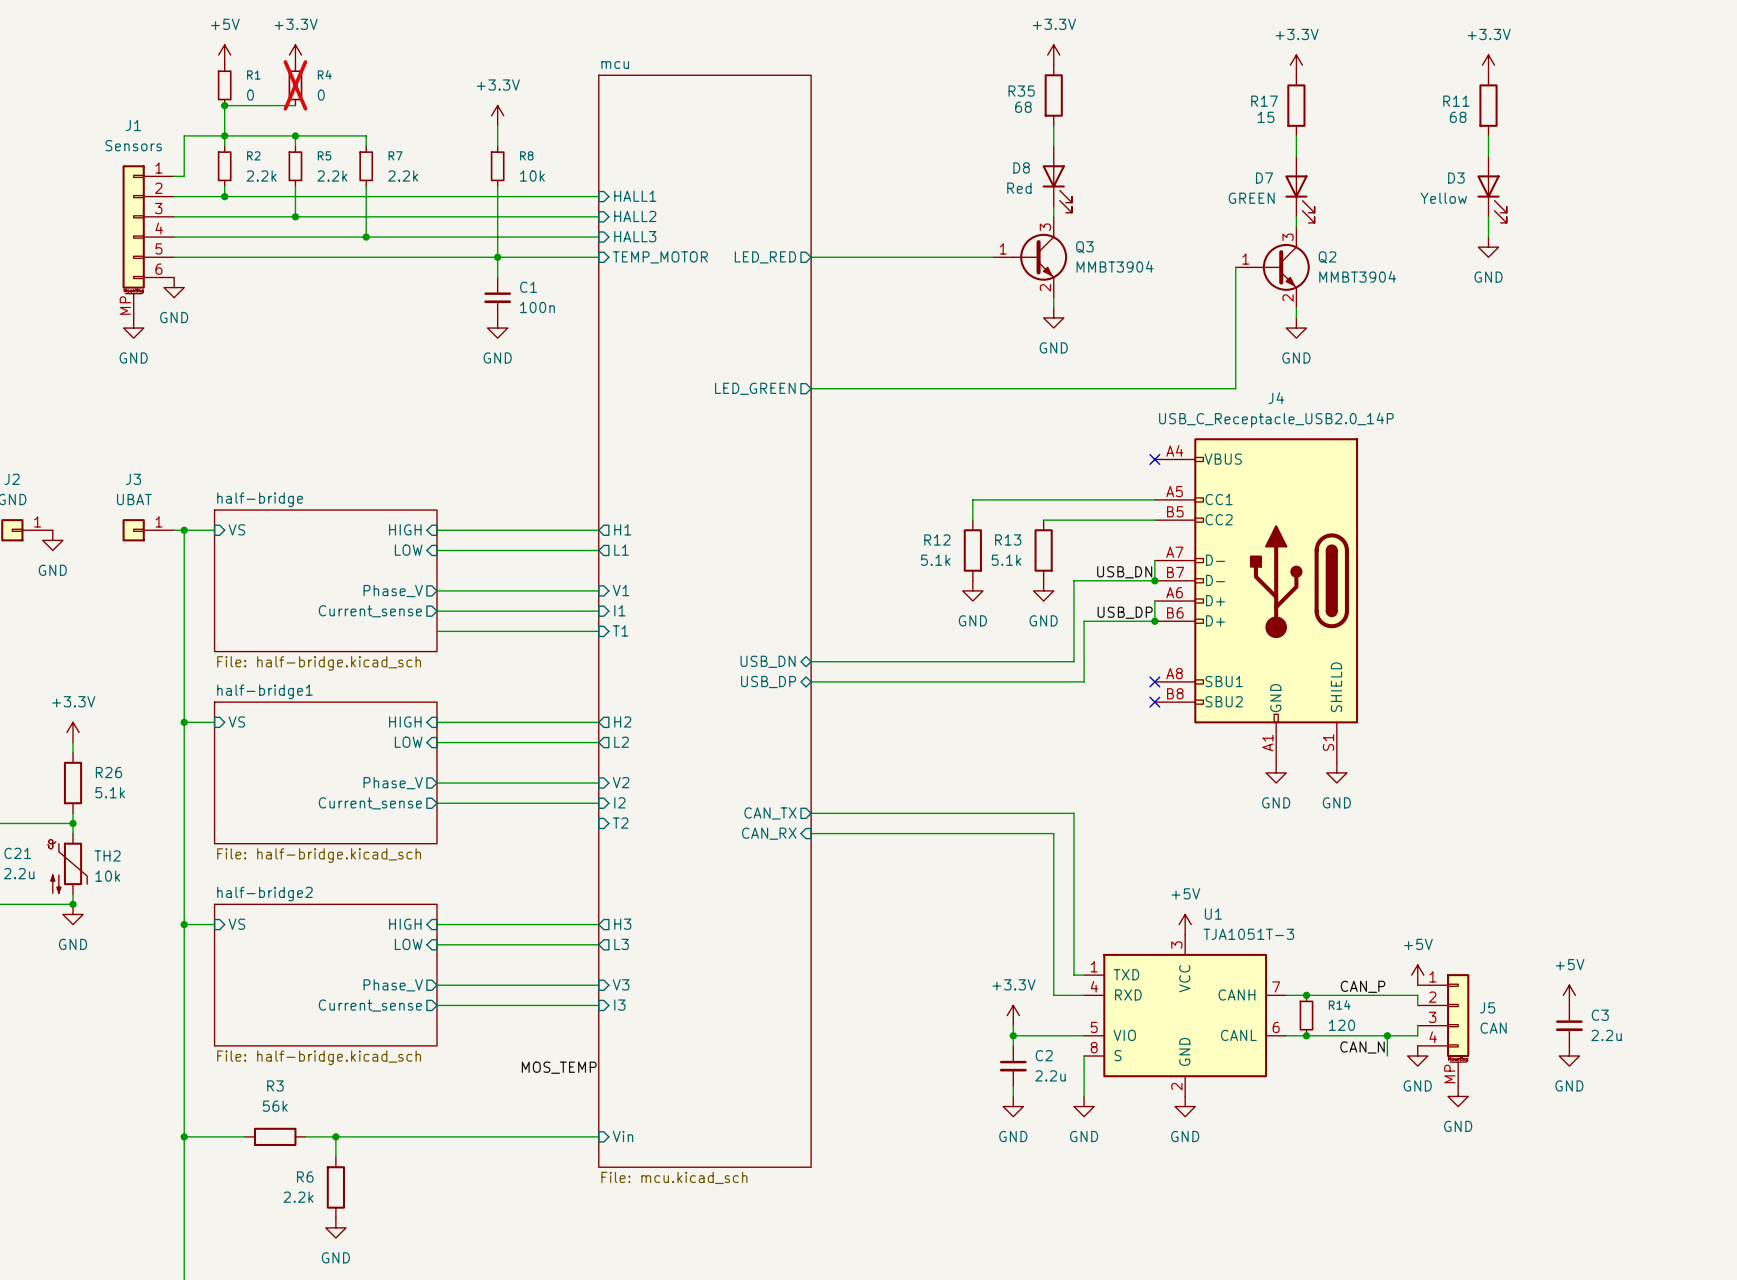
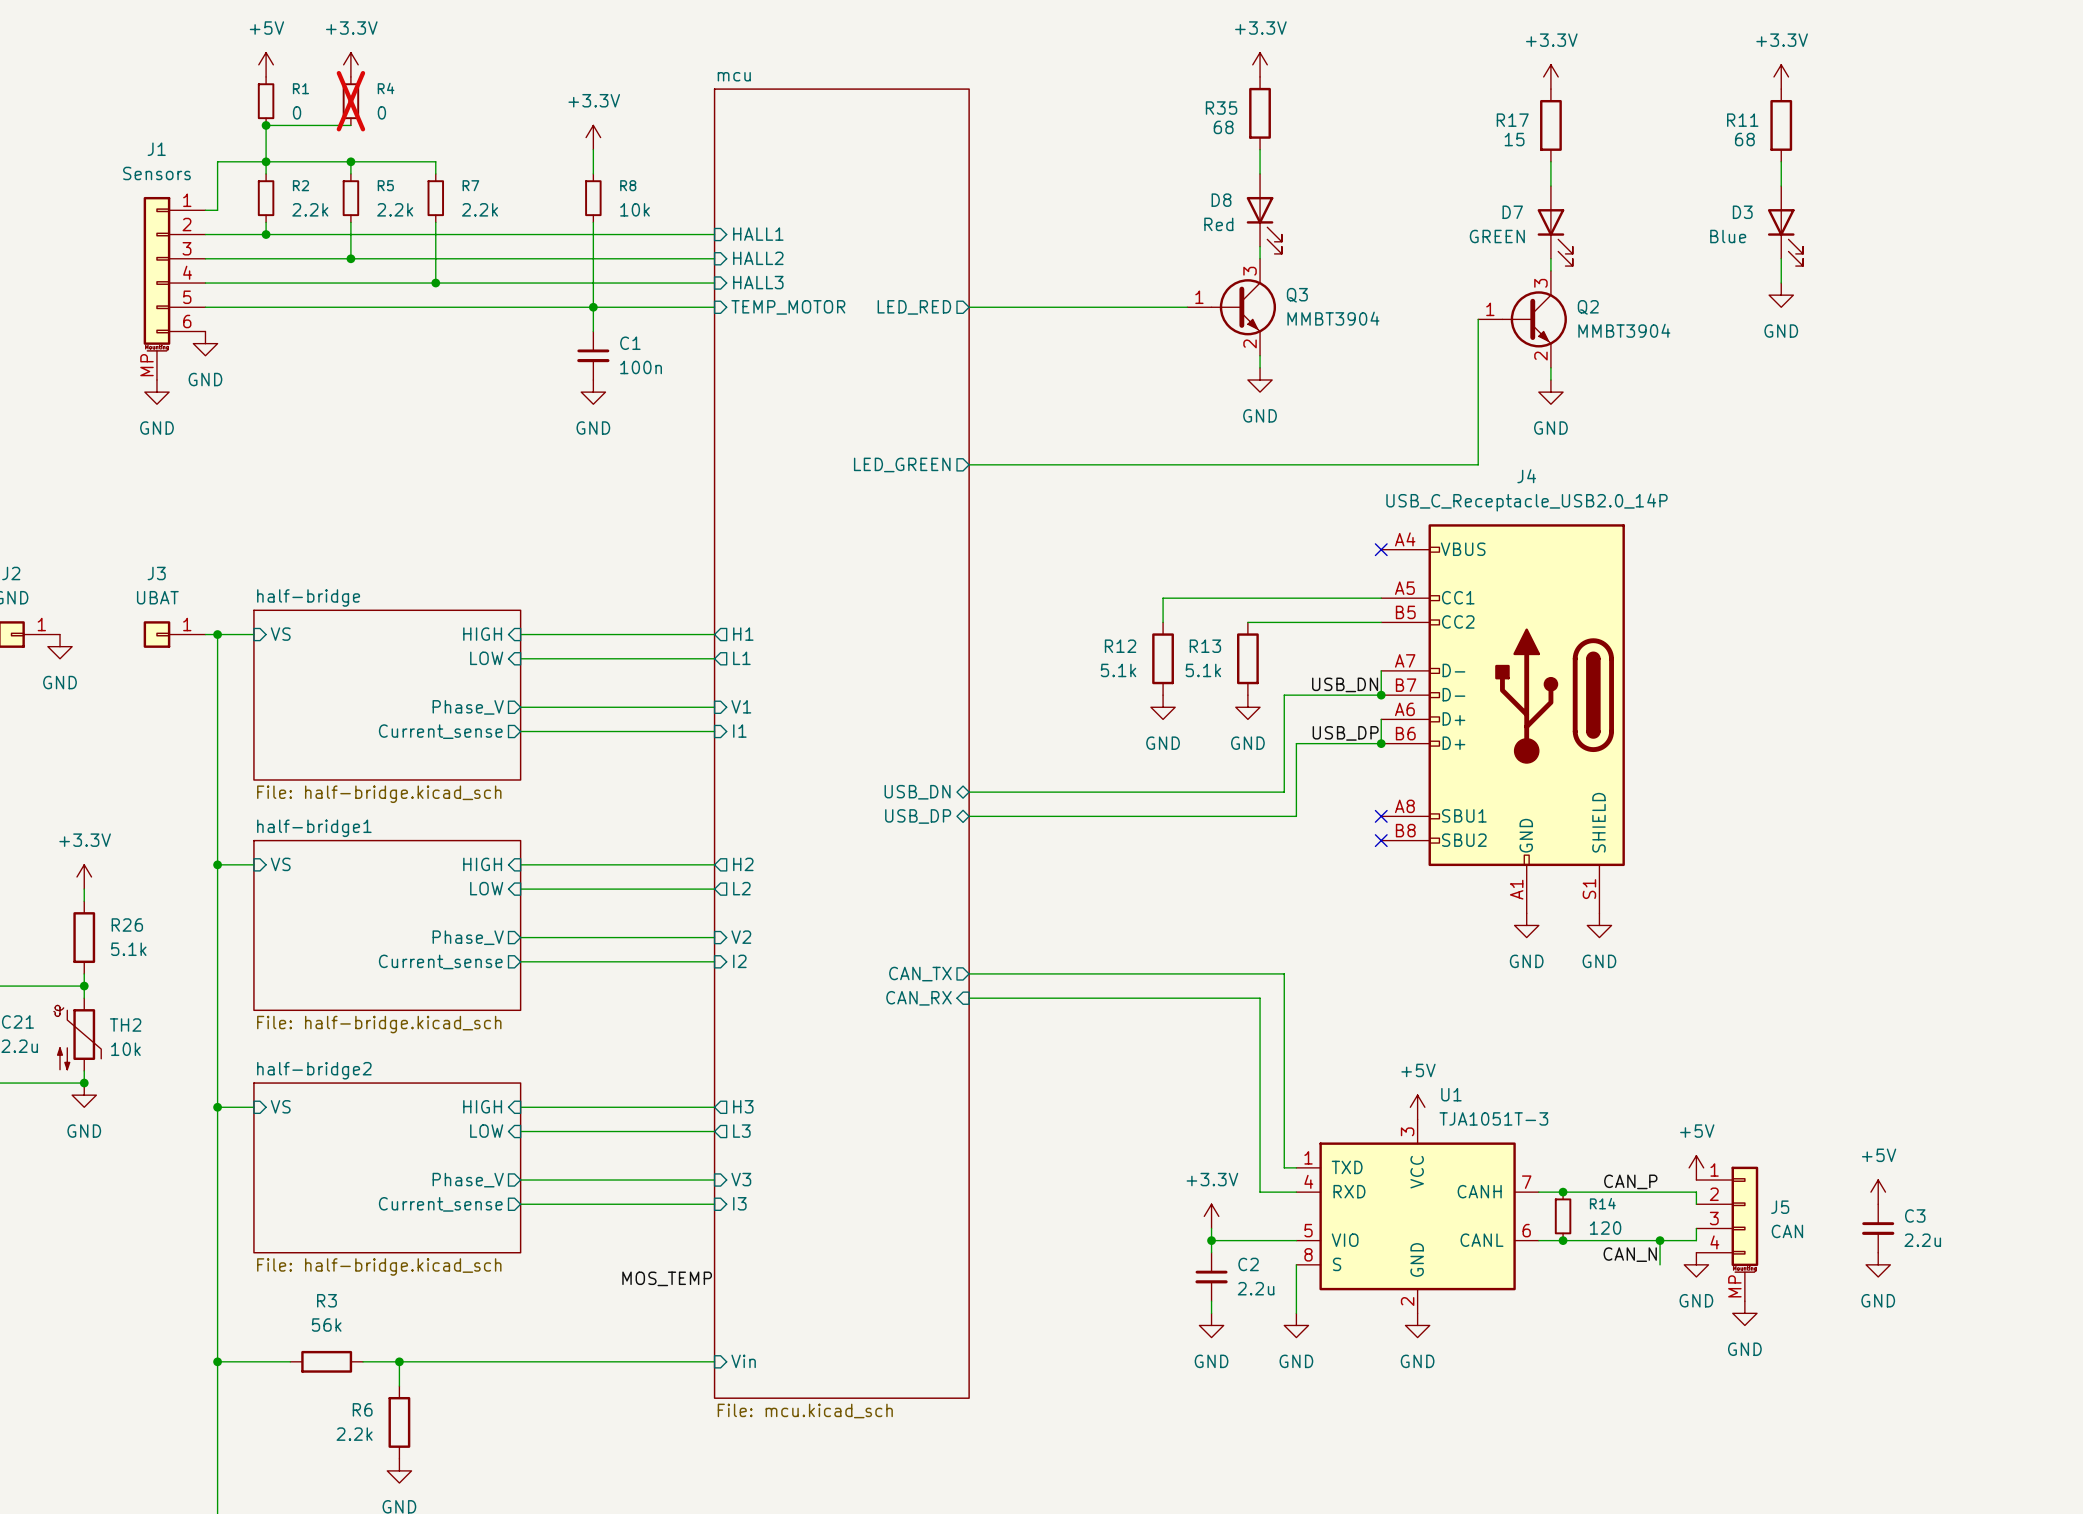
D3 value: Yellow (1443, 198) -> Blue (1728, 236)
sheet pin: T1 (620, 630) -> none
wire: (437, 631) (598, 631) -> none
sheet pin: T2 (620, 823) -> none

